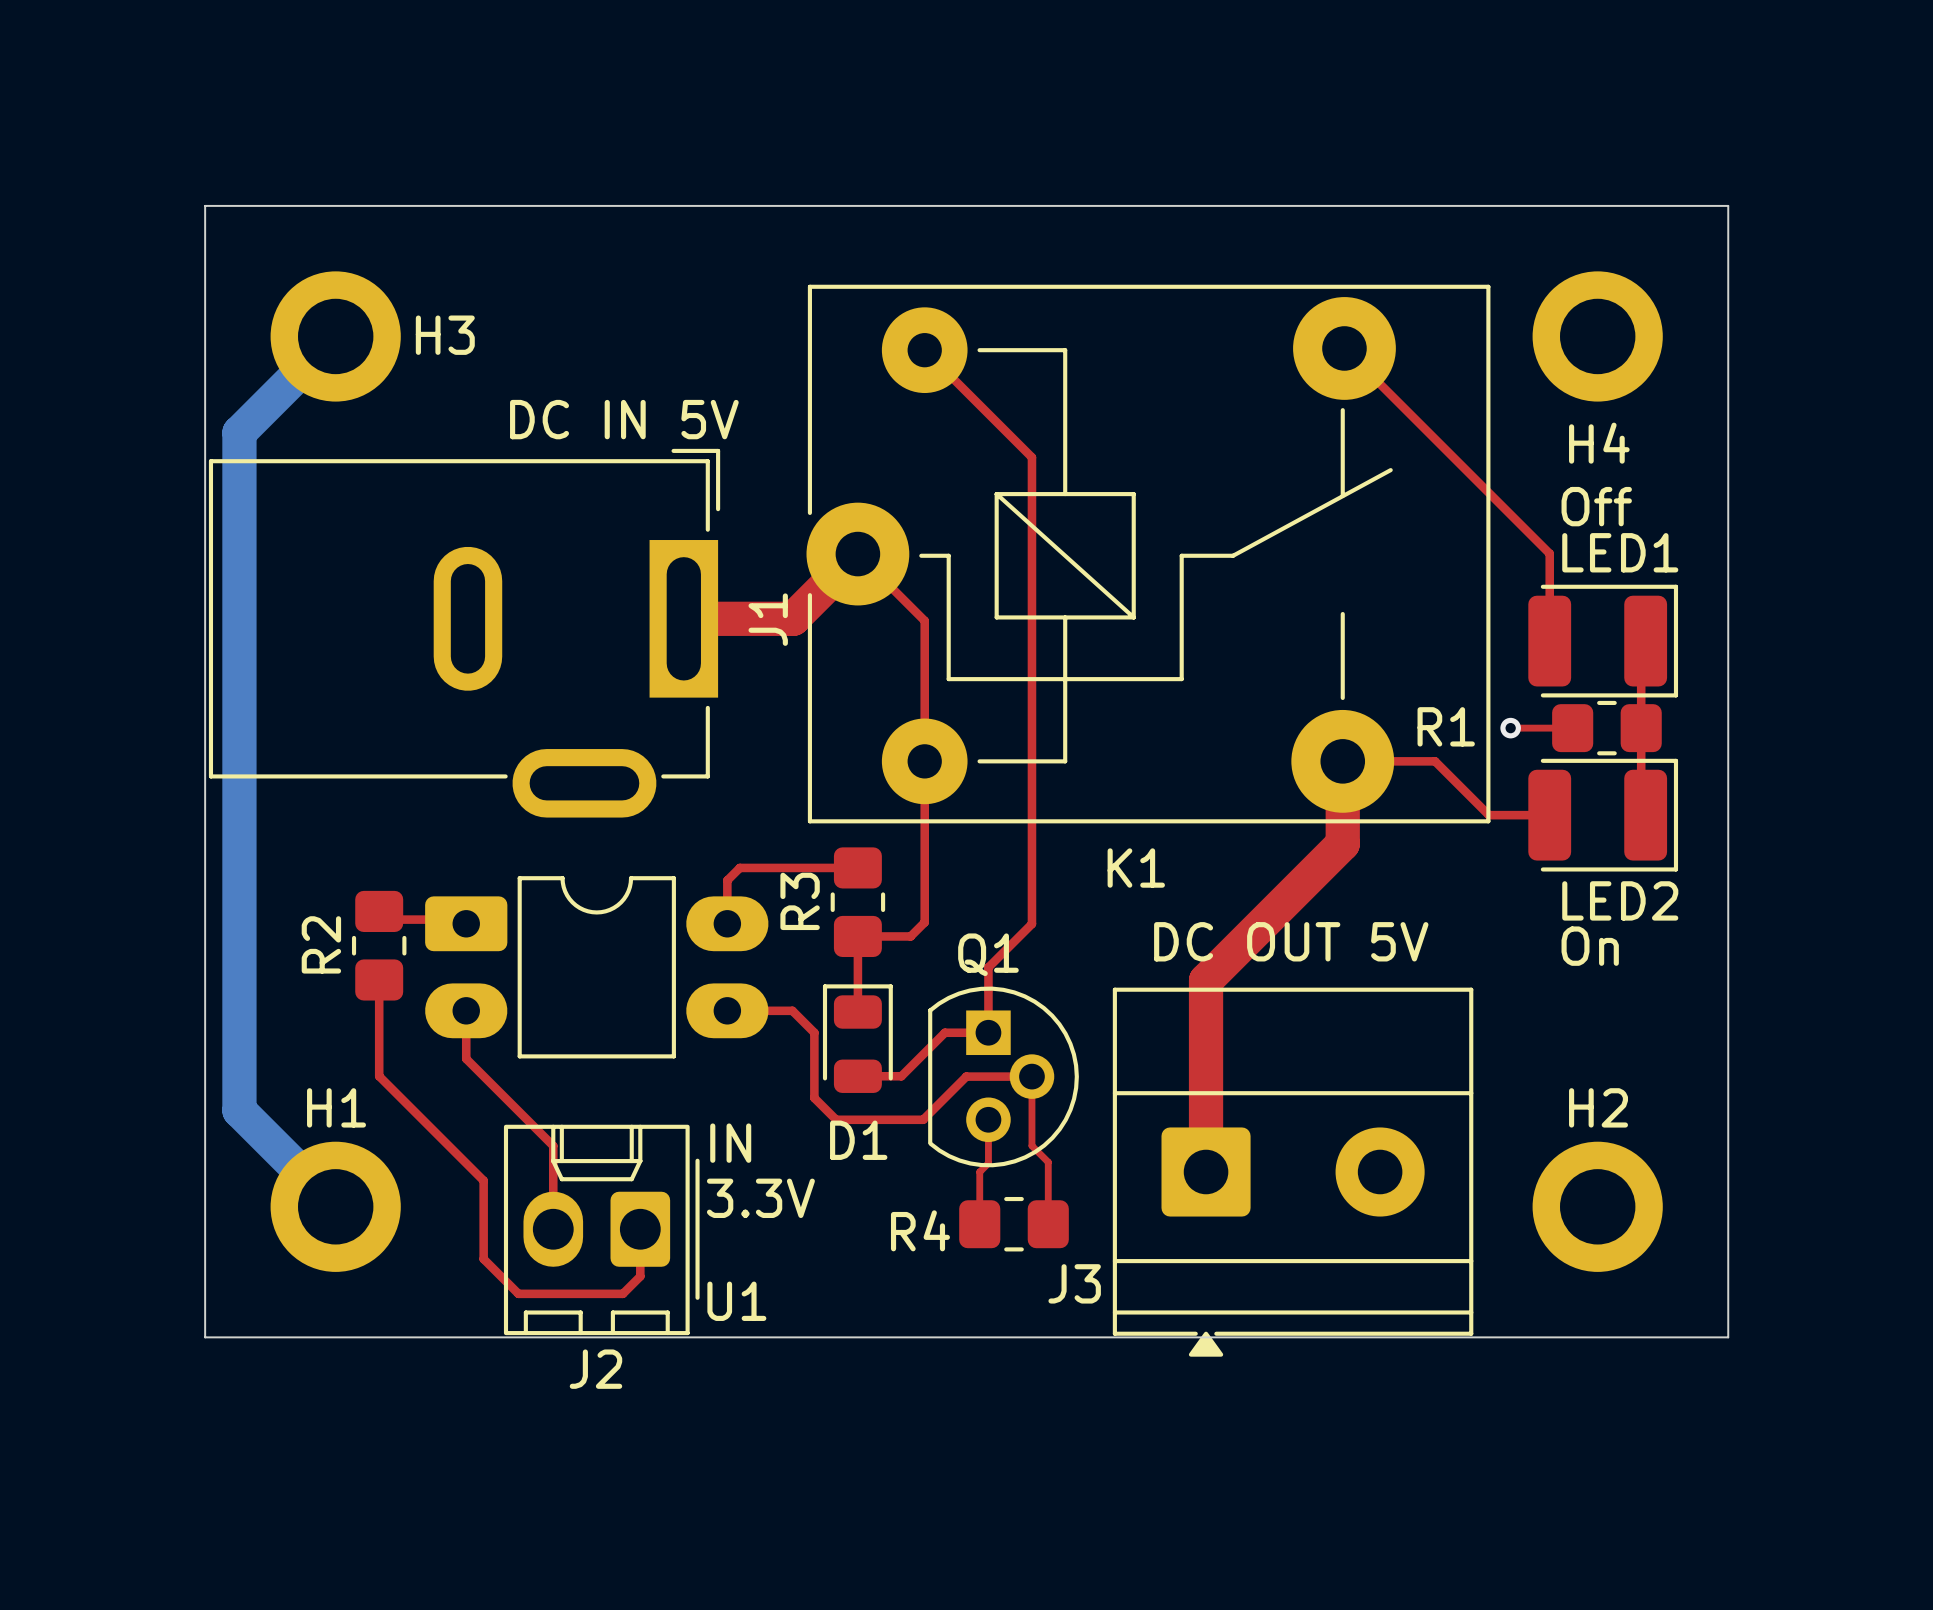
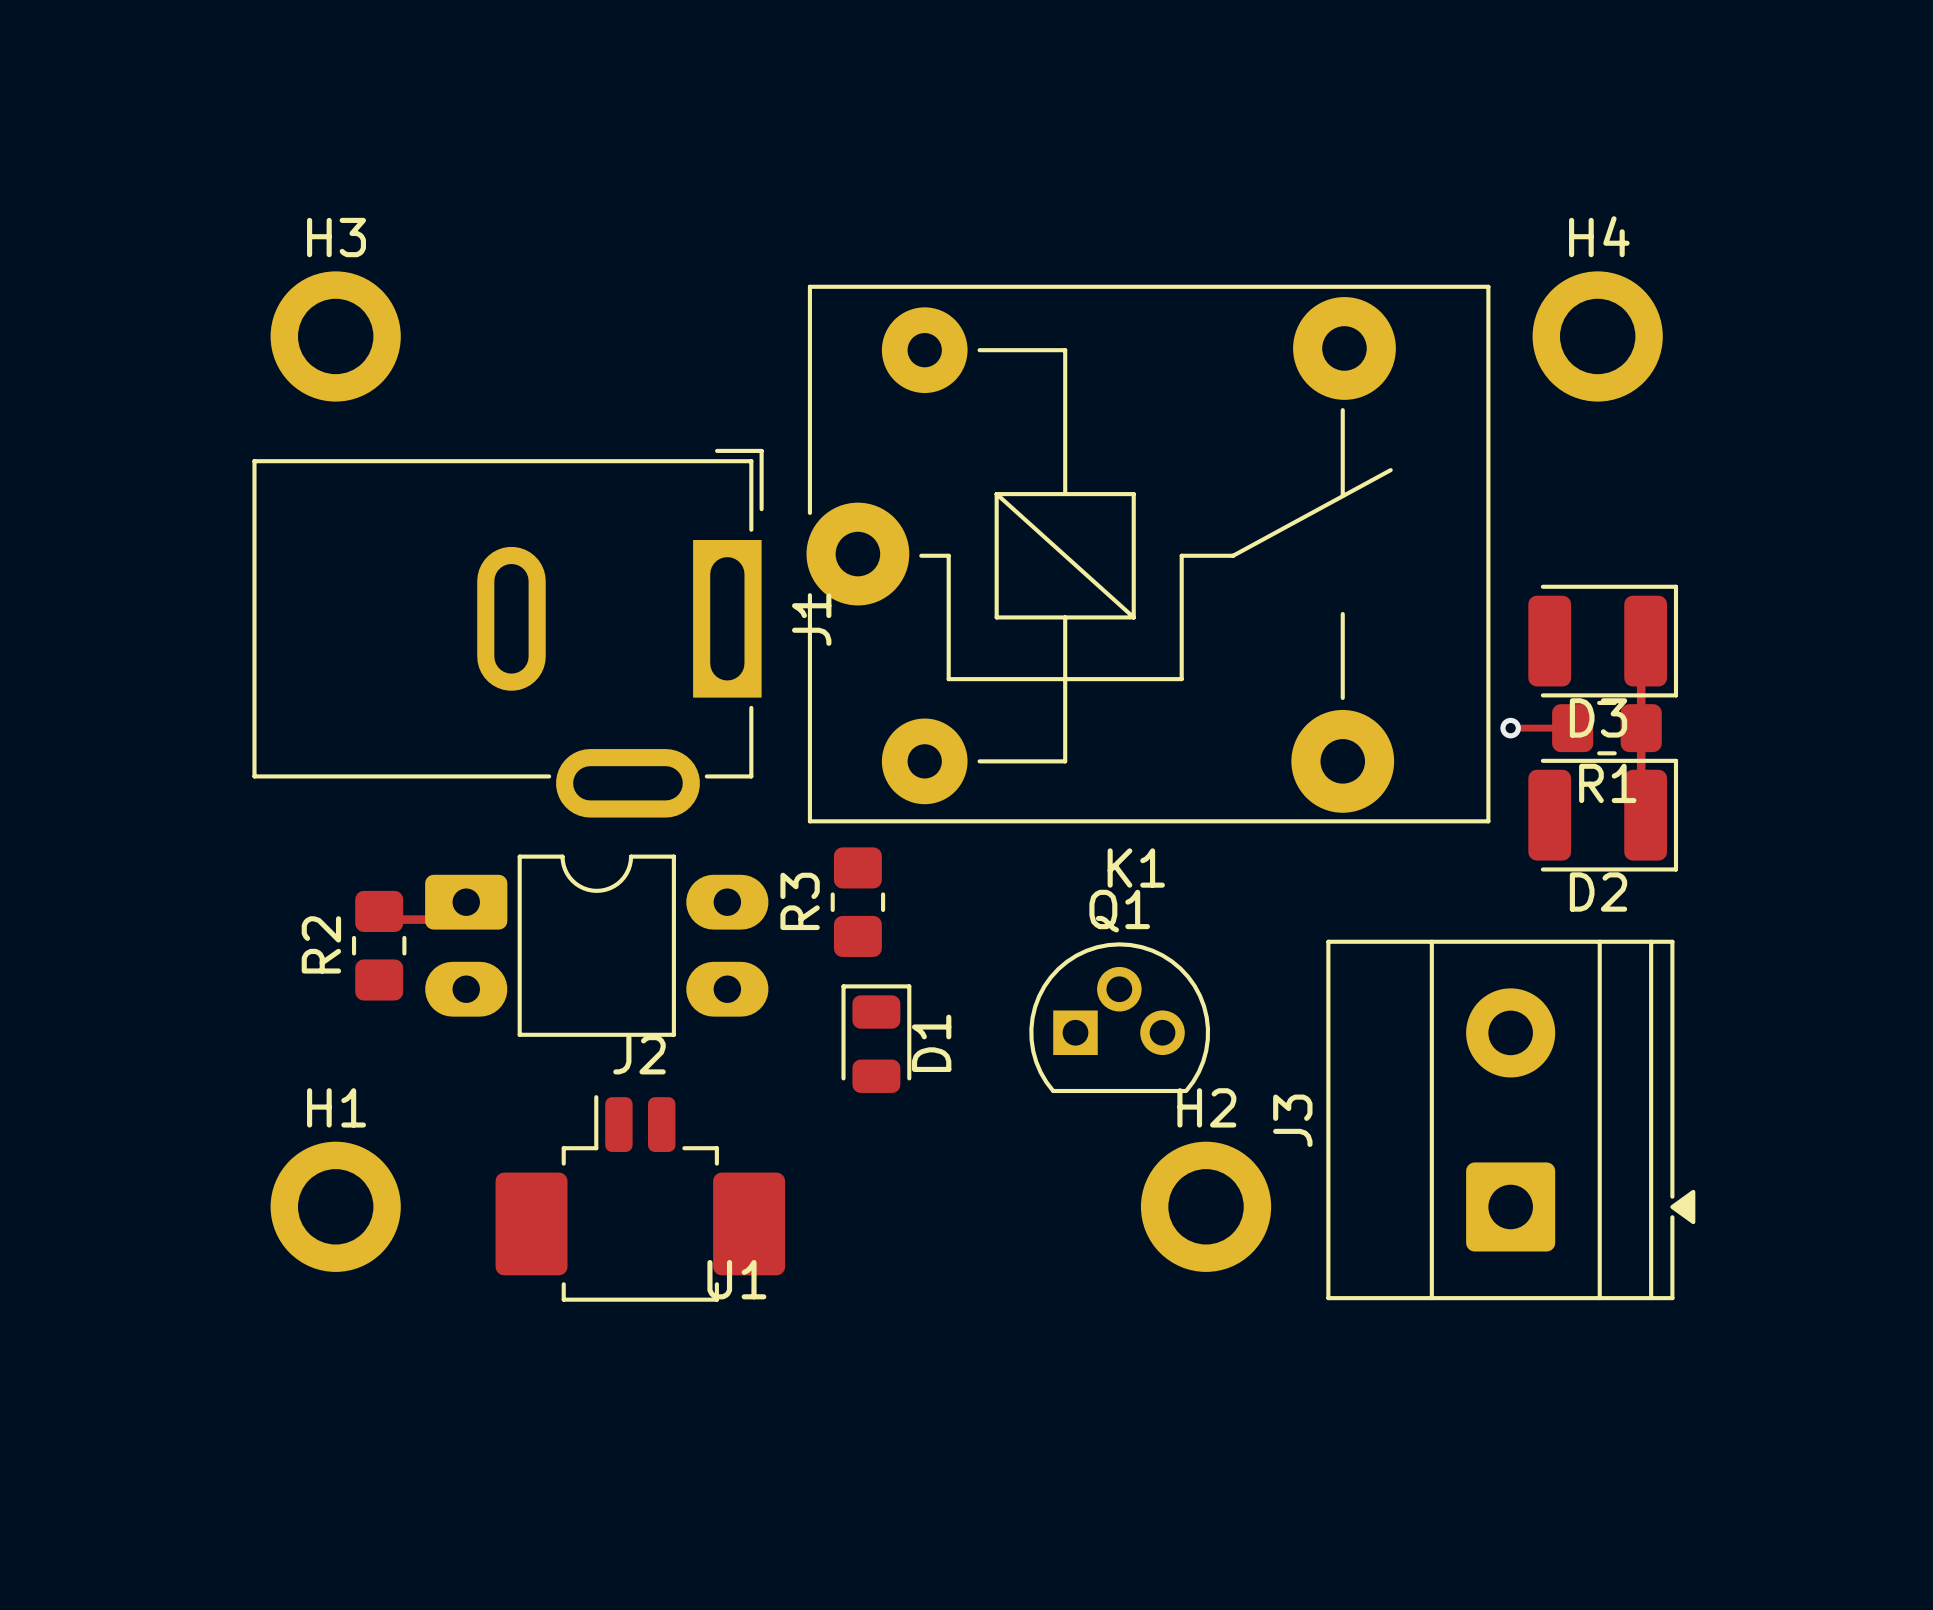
board edge: (205, 205) (1728, 205) (1728, 1337) (205, 1337) (205, 205) -> none
H3 name position: H3 (445, 335) -> H3 (336, 237)
bottom track: (335, 336) (239, 432) (239, 1110) (335, 1206) -> none
top track: (1344, 348) (1549, 553) (1549, 641) -> none
top track: (924, 350) (1031, 457) (1031, 923) (988, 967) (988, 1032) (944, 1032) (901, 1076) (879, 1076) -> none
text: DC IN 5V (624, 419) -> none
H4 name position: H4 (1599, 443) -> H4 (1599, 236)
text: Off (1596, 506) -> none
LED1 name: LED1 (1620, 552) -> D3 (1598, 717)
top track: (683, 618) (793, 618) (857, 554) (924, 620) (924, 922) (910, 936) (857, 936) (857, 1012) -> none
J1 position: (464, 633) -> (508, 633)
R1 name position: R1 (1446, 726) -> R1 (1607, 783)
top track: (1545, 815) (1488, 815) (1435, 761) (1342, 761) (1342, 843) (1206, 980) (1206, 1172) -> none
top track: (857, 867) (739, 867) (727, 880) (727, 923) -> none
LED2 name: LED2 (1620, 900) -> D2 (1598, 892)
text: DC OUT 5V (1291, 941) -> none
text: On (1590, 946) -> none
U1 position: (596, 967) -> (596, 945)
top track: (379, 979) (379, 1076) (483, 1180) (483, 1259) (518, 1293) (622, 1293) (640, 1276) (640, 1229) -> none
top track: (466, 1010) (466, 1058) (553, 1145) (553, 1229) -> none
top track: (727, 1010) (792, 1010) (814, 1032) (814, 1098) (836, 1119) (923, 1119) (966, 1076) (1031, 1076) (1031, 1145) (1048, 1162) (1048, 1224) -> none
D1 position: (857, 1038) -> (876, 1038)
Q1 rotation: 0° (1003, 1076) -> 90° counterclockwise (1119, 1017)
Q1 position: (1003, 1076) -> (1119, 1017)
top track: (988, 1119) (988, 1163) (979, 1172) (979, 1224) -> none
J2 footprint: [503, 1124, 700, 1336] -> [495, 1095, 786, 1302]
D1 name rotation: 0° (858, 1140) -> 90° counterclockwise (931, 1043)
D1 name position: D1 (858, 1140) -> D1 (931, 1043)
text: IN (730, 1143) -> none
J3 rotation: 0° (1293, 1172) -> 90° counterclockwise (1510, 1119)
J3 position: (1293, 1172) -> (1510, 1119)
text: 3.3V (760, 1198) -> none
H2 position: (1597, 1206) -> (1206, 1206)
R4: (1014, 1224) -> none
J3 name position: J3 (1074, 1283) -> J3 (1292, 1120)
J2 name position: J2 (595, 1369) -> J2 (639, 1054)

